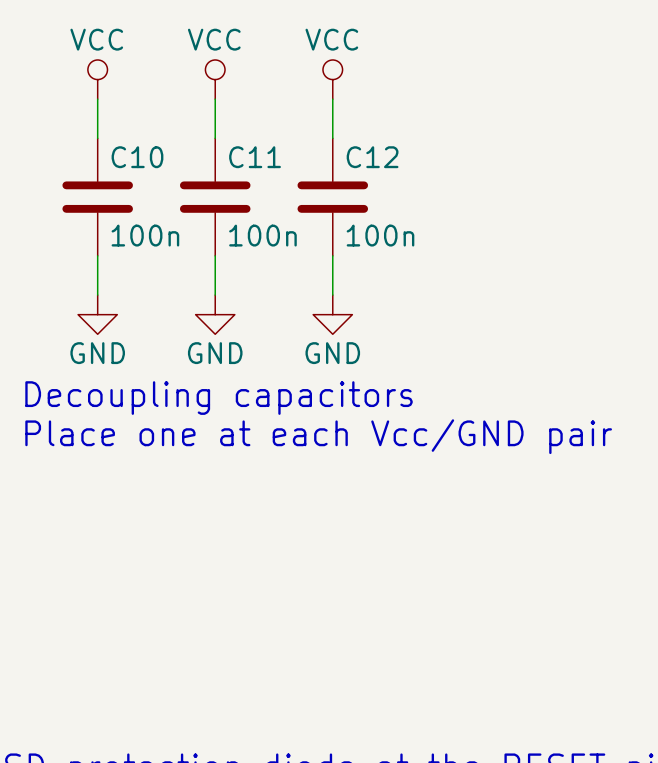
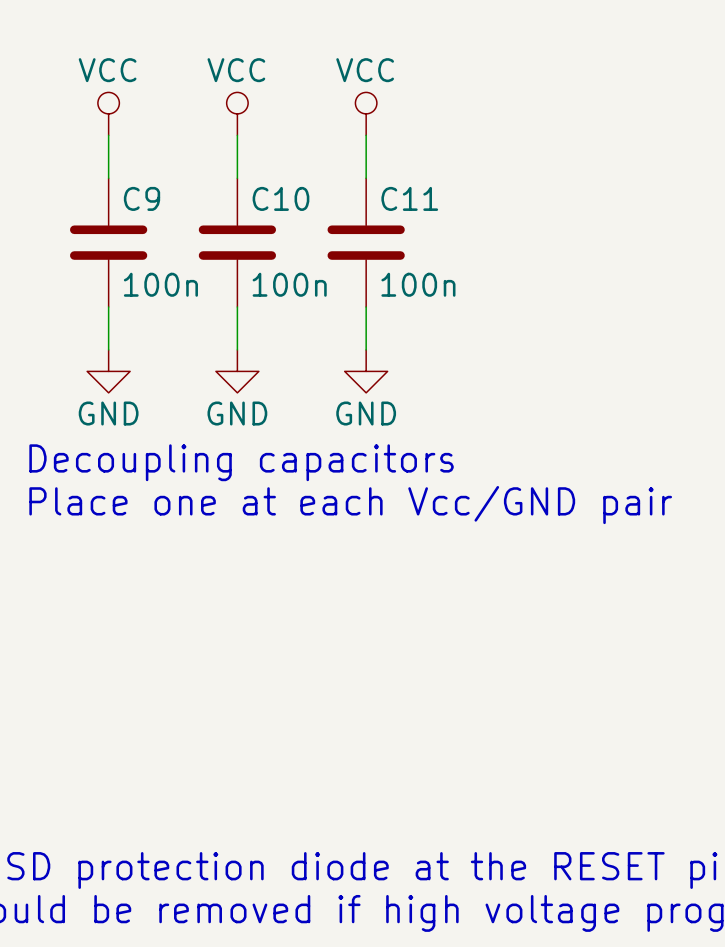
C10 name: C10 (137, 157) -> C9 (142, 198)
C11 name: C11 (255, 157) -> C10 (280, 198)
C12 name: C12 (372, 157) -> C11 (409, 198)

